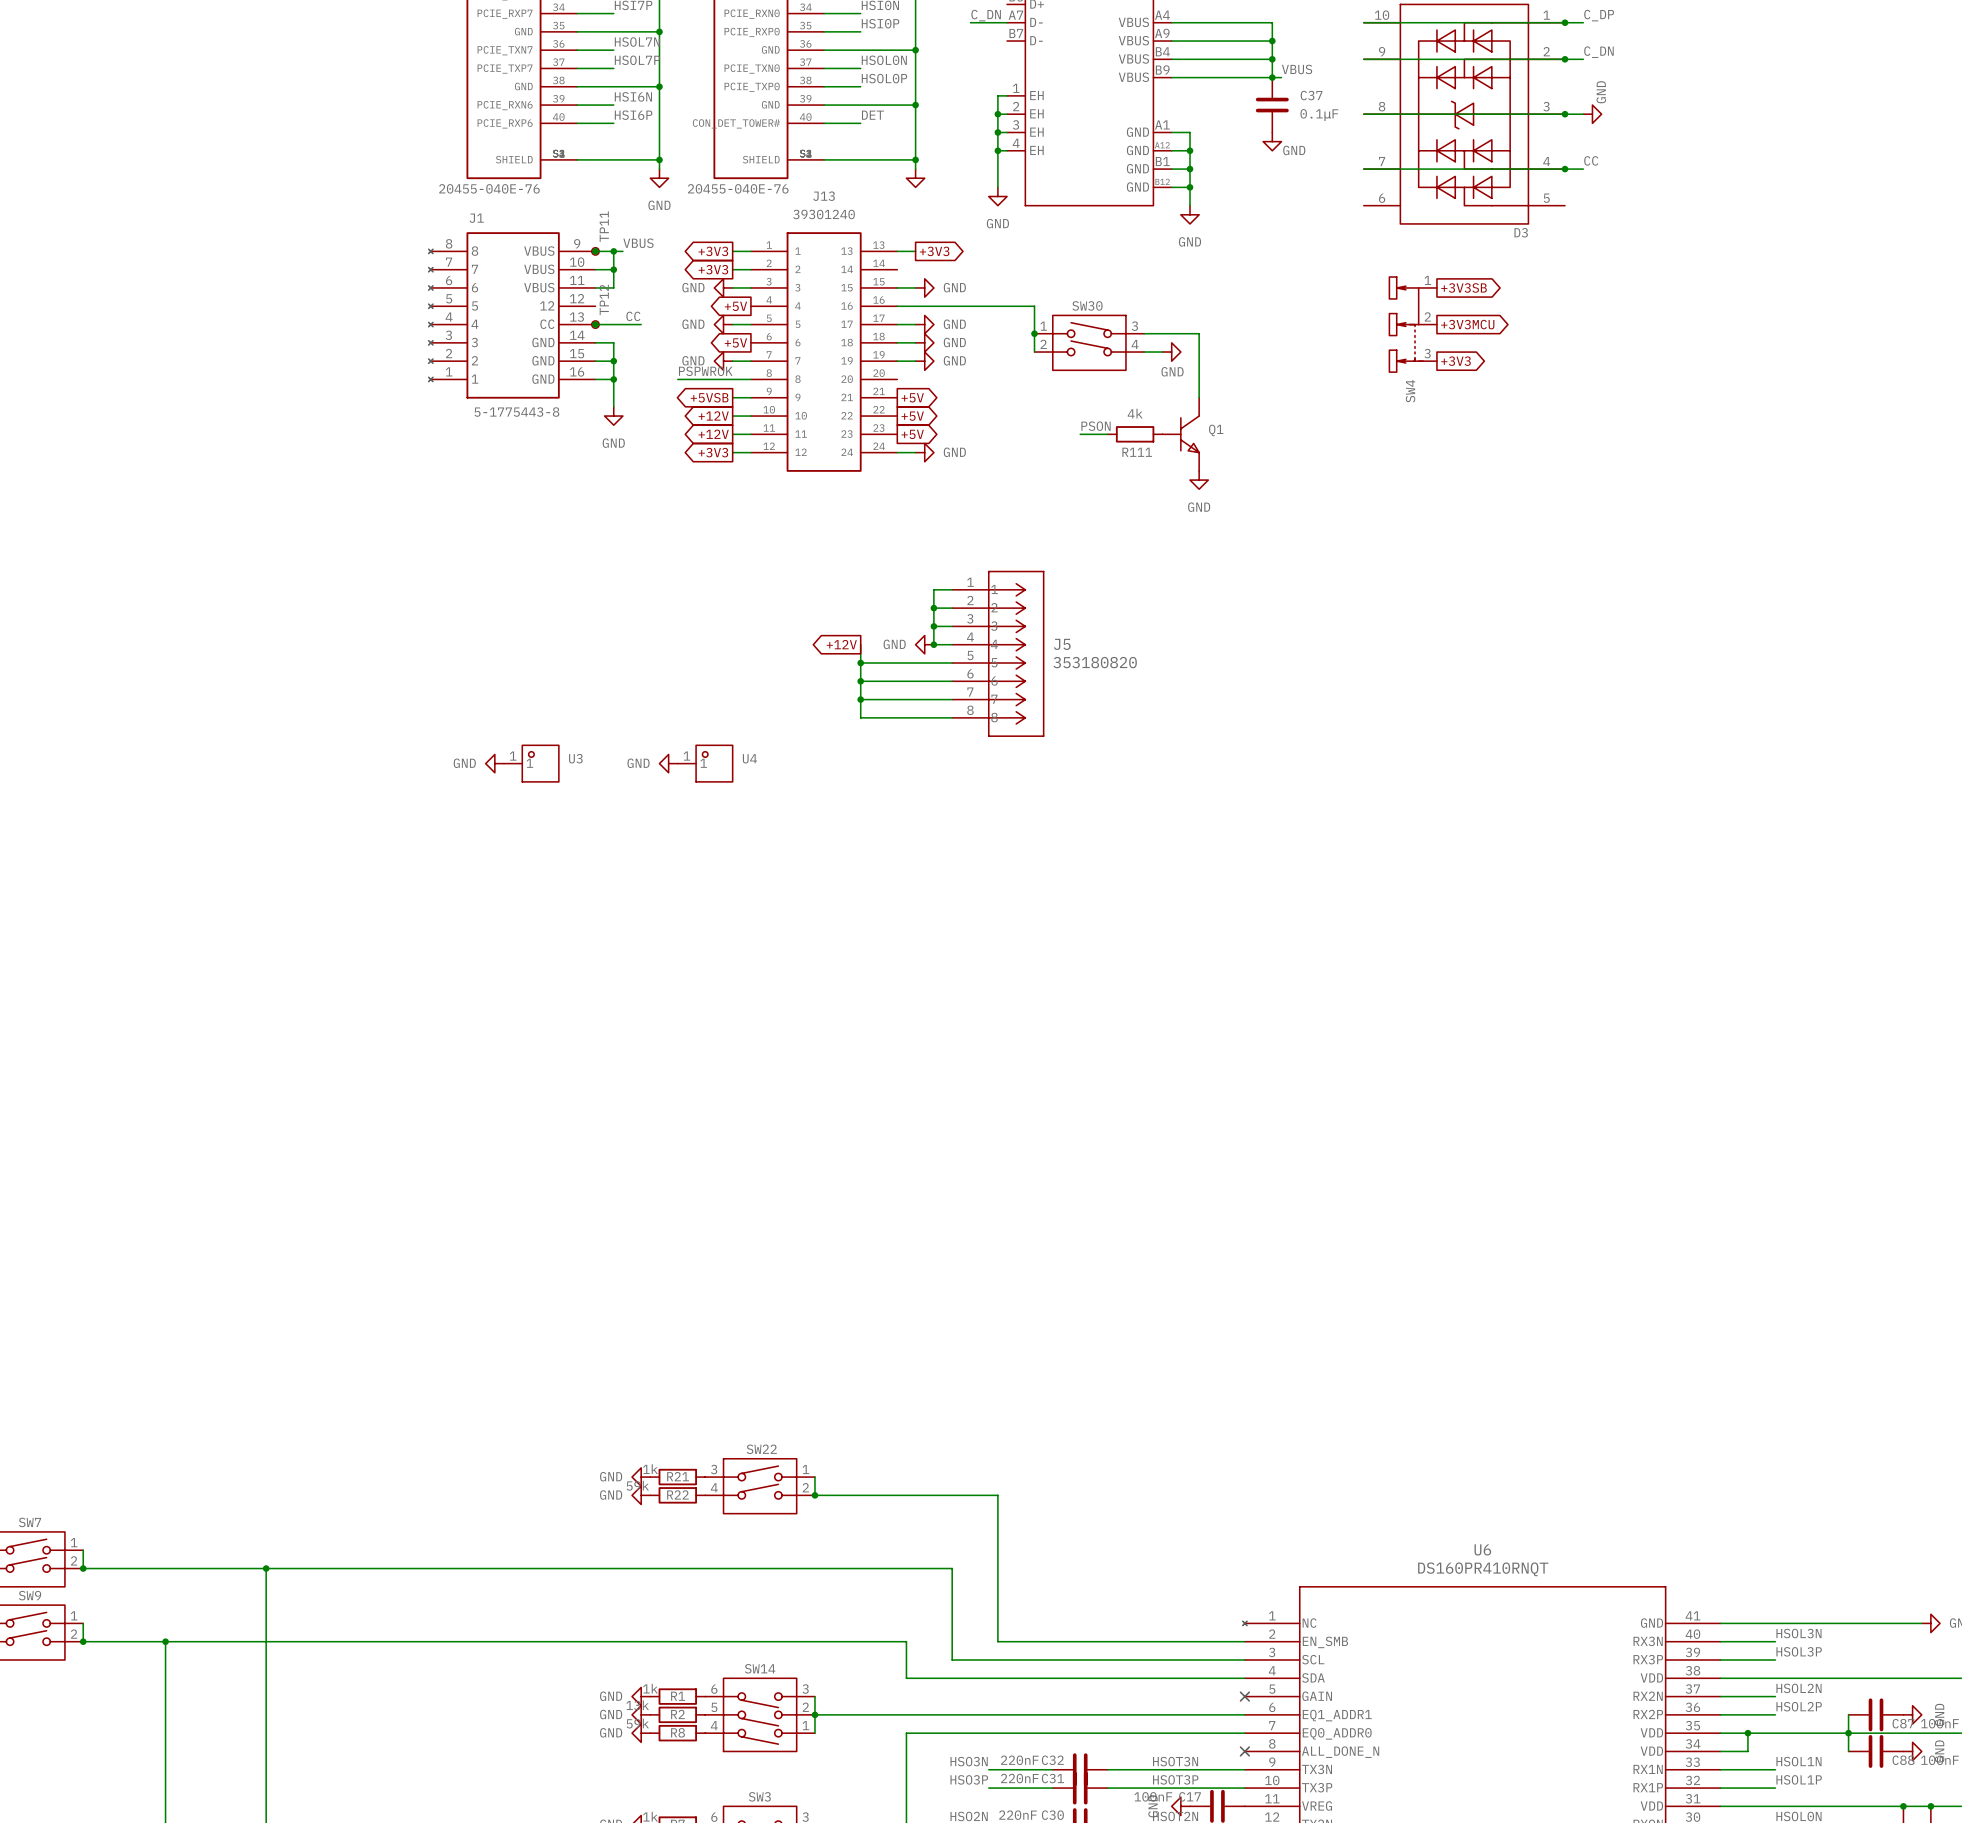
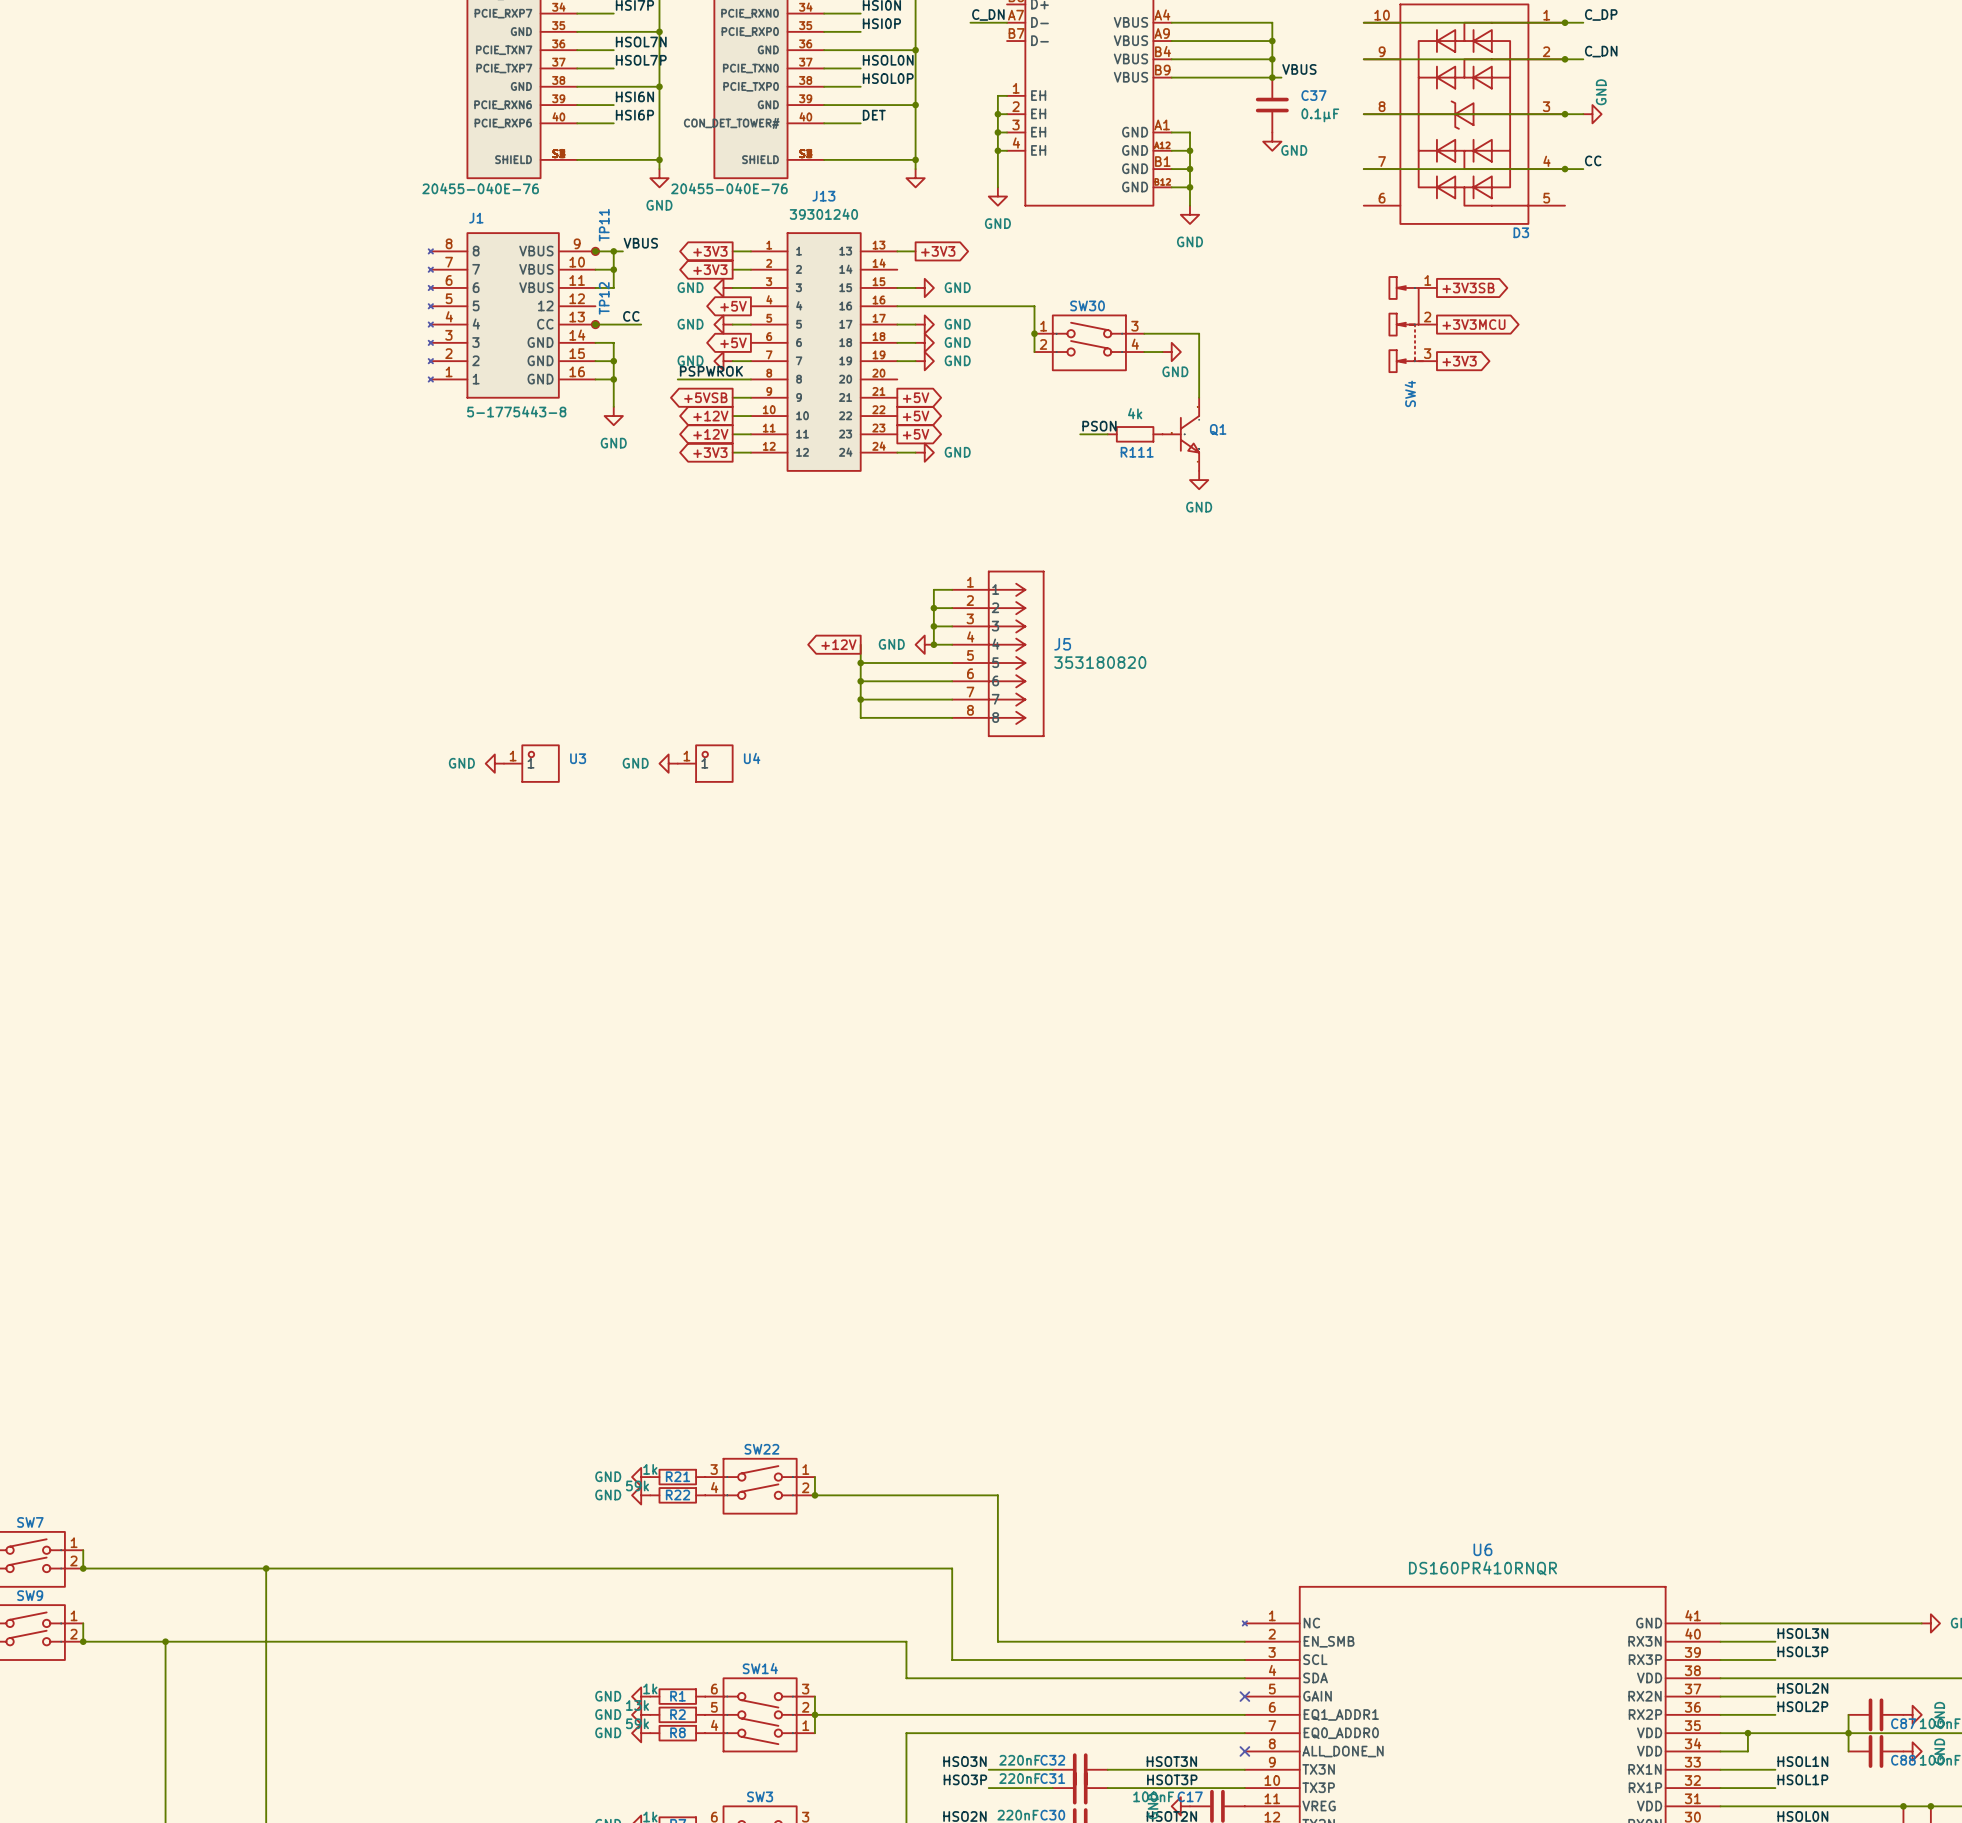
U6 value: DS160PR410RNQT (1483, 1569) -> DS160PR410RNQR (1482, 1568)

